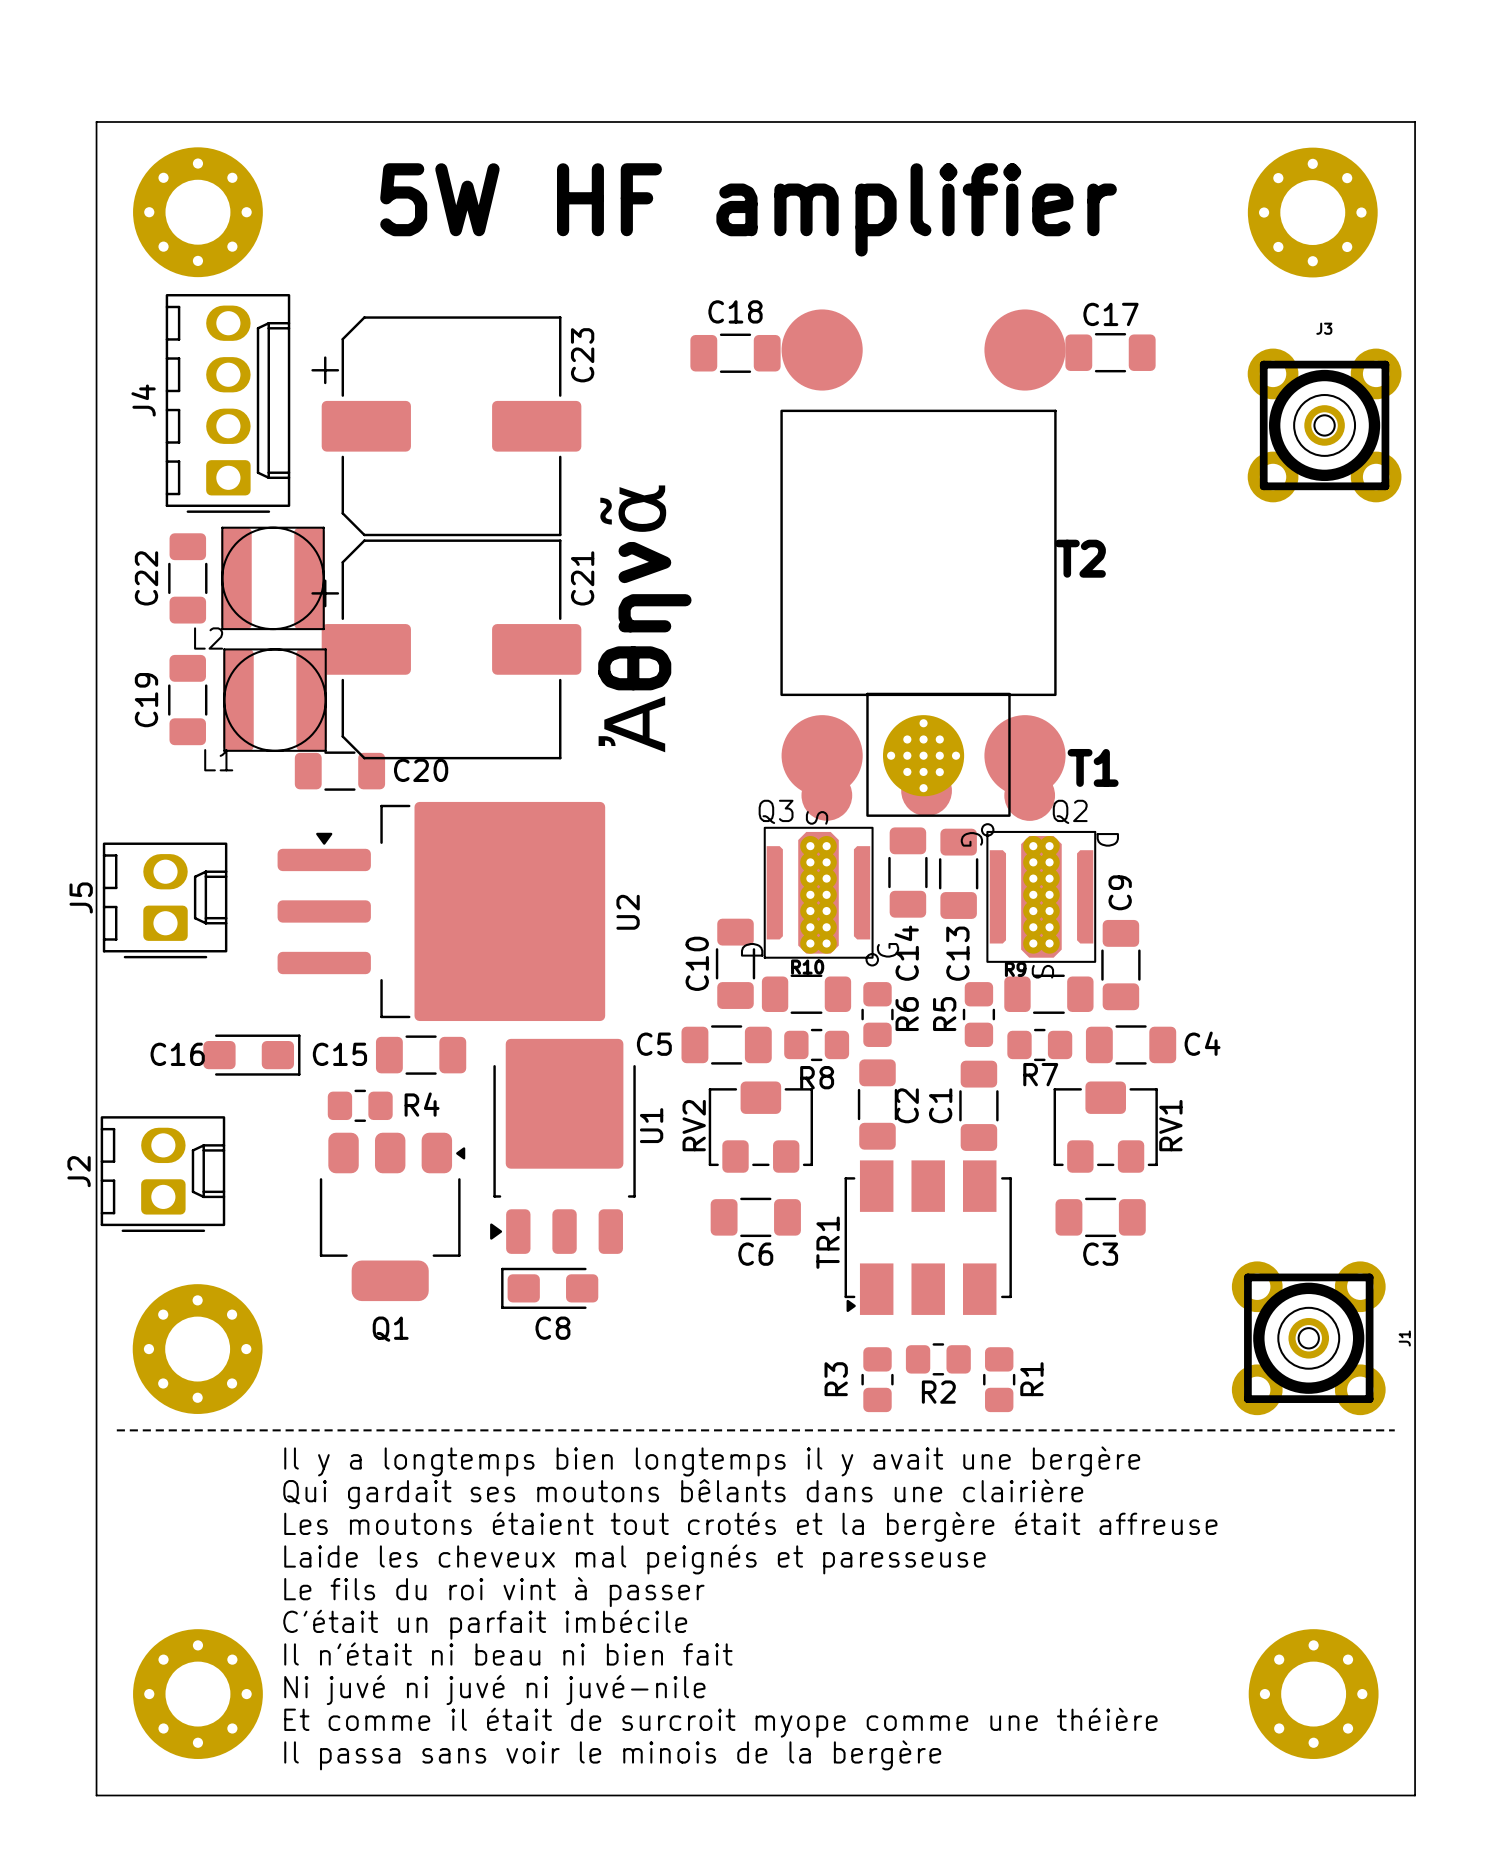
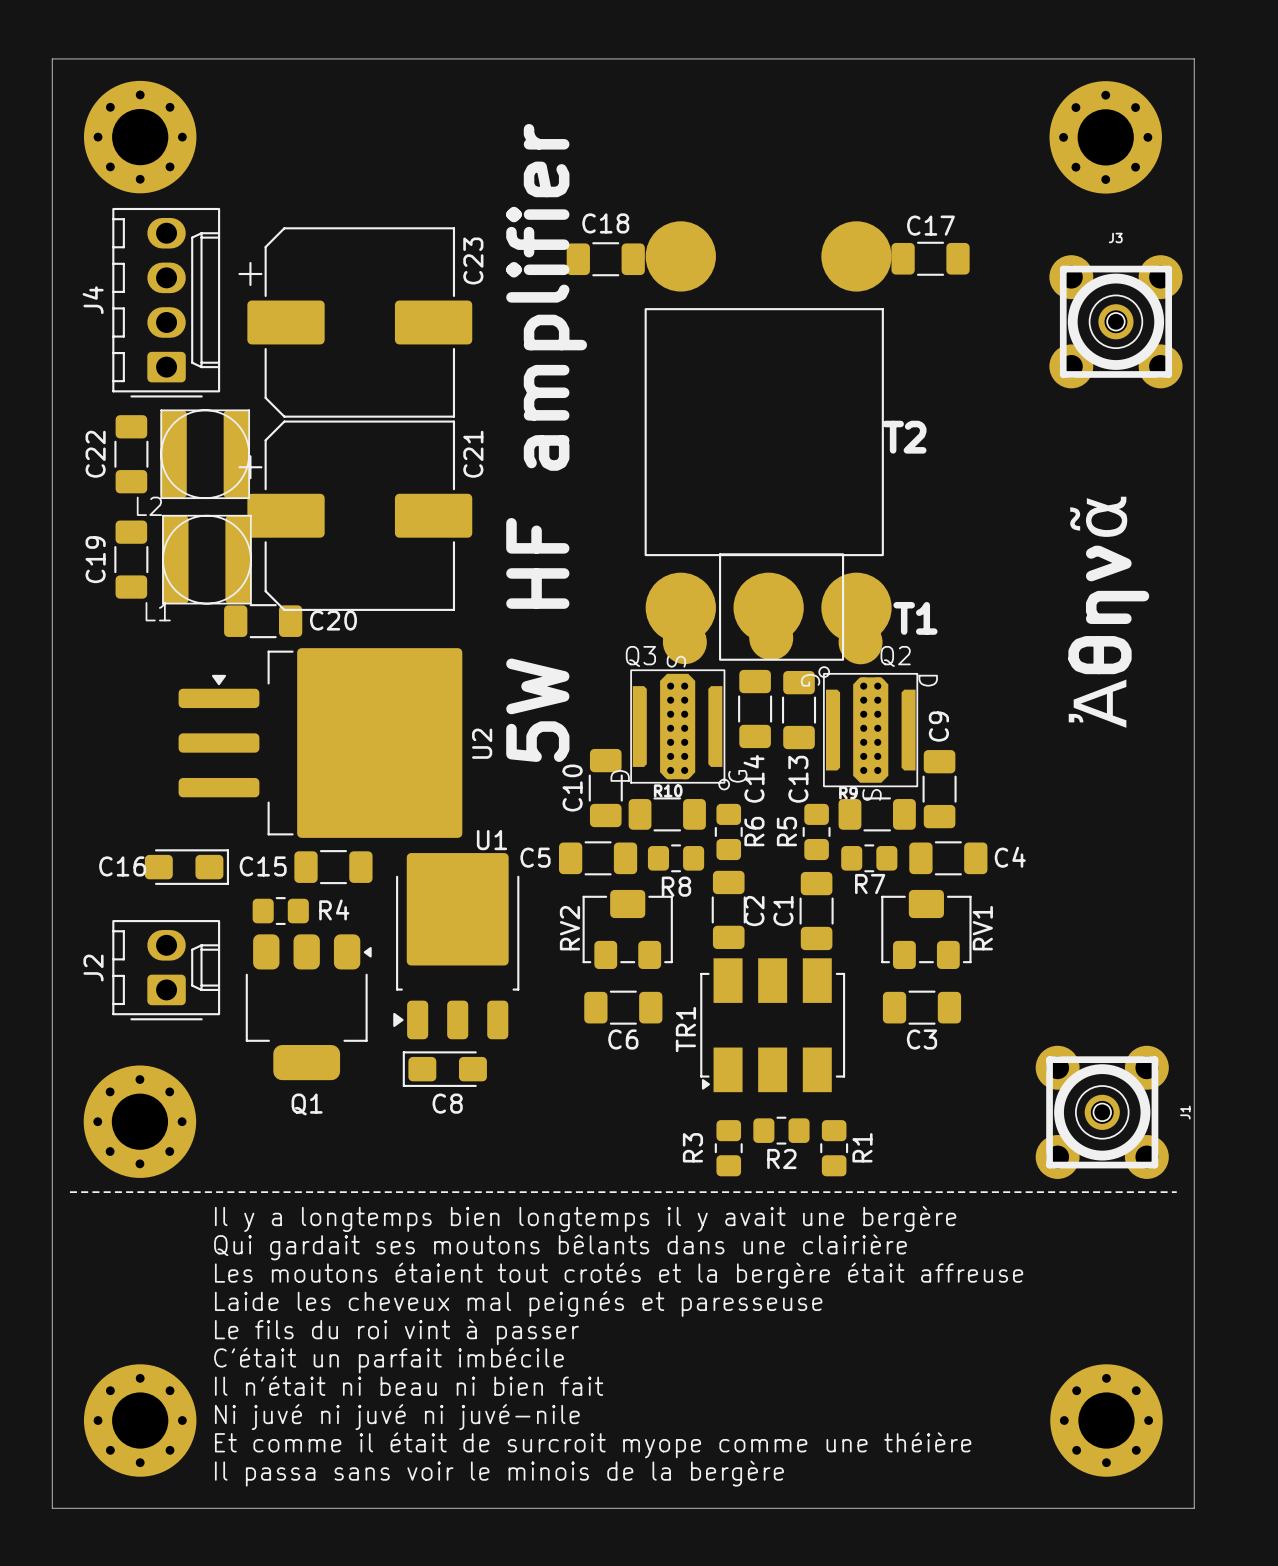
text rotation: 0° (748, 209) -> 90° counterclockwise (546, 442)
T2 footprint: [780, 309, 1066, 797] -> [644, 221, 892, 643]
text: Ἀθηνᾶ (642, 618) -> none
text: none -> Ἀθηνᾶ (1106, 612)
J5: (165, 900) -> none
U2 position: (441, 911) -> (320, 743)
U1 name rotation: 0° (651, 1125) -> 90° clockwise (491, 840)
U1 name position: U1 (651, 1125) -> U1 (491, 840)
J2 position: (162, 1174) -> (166, 970)

